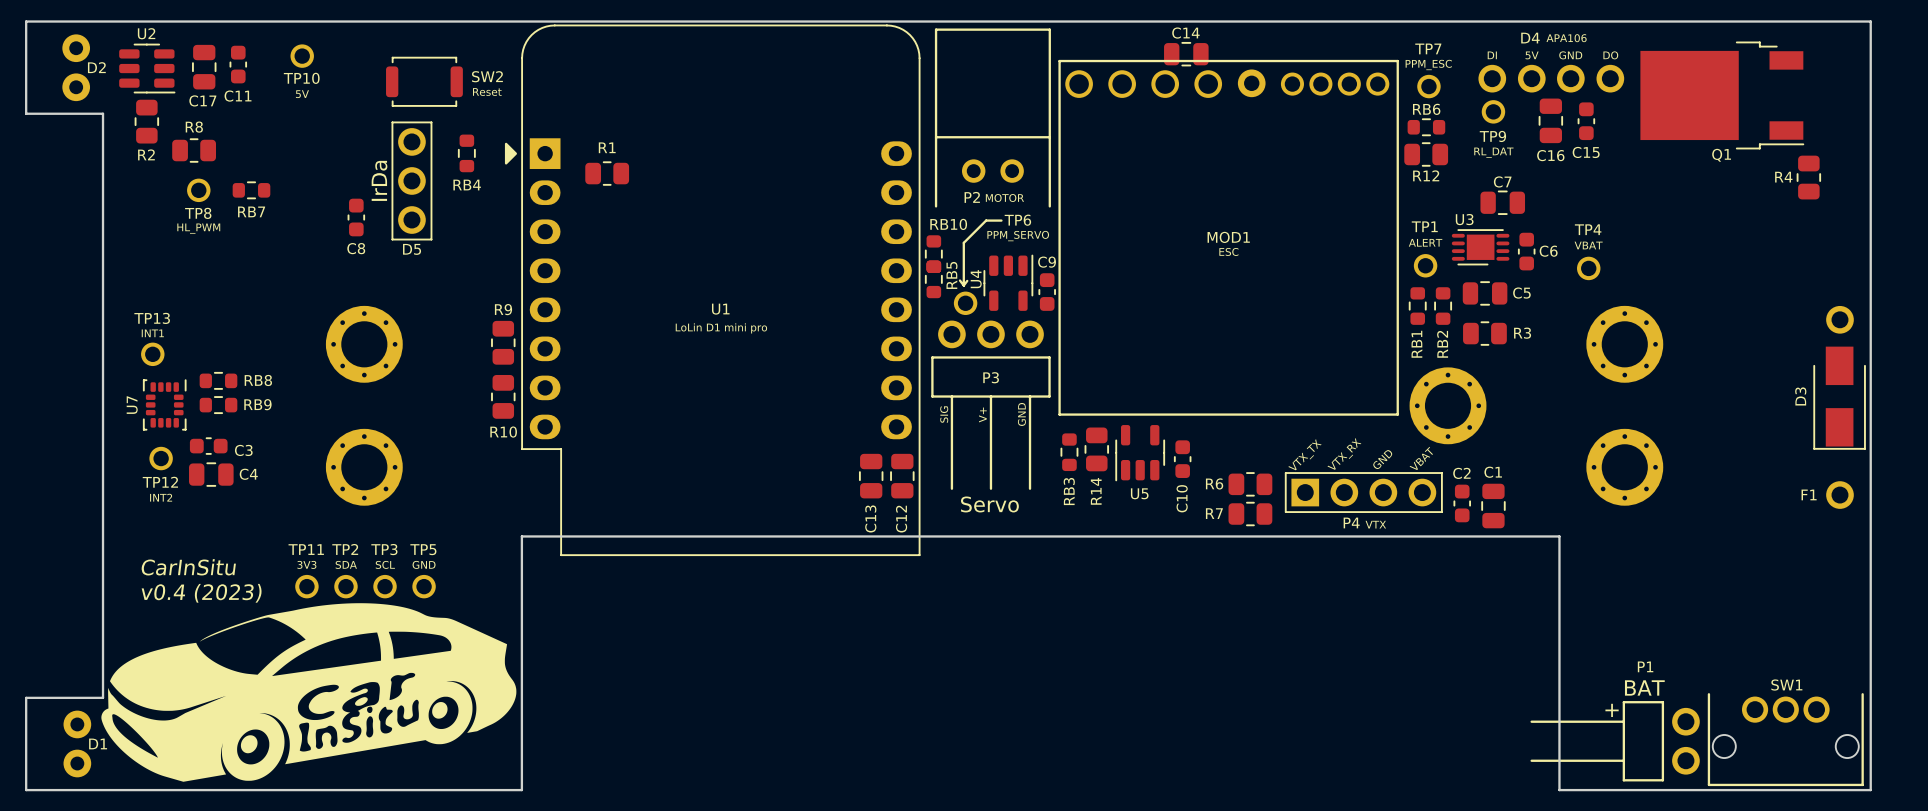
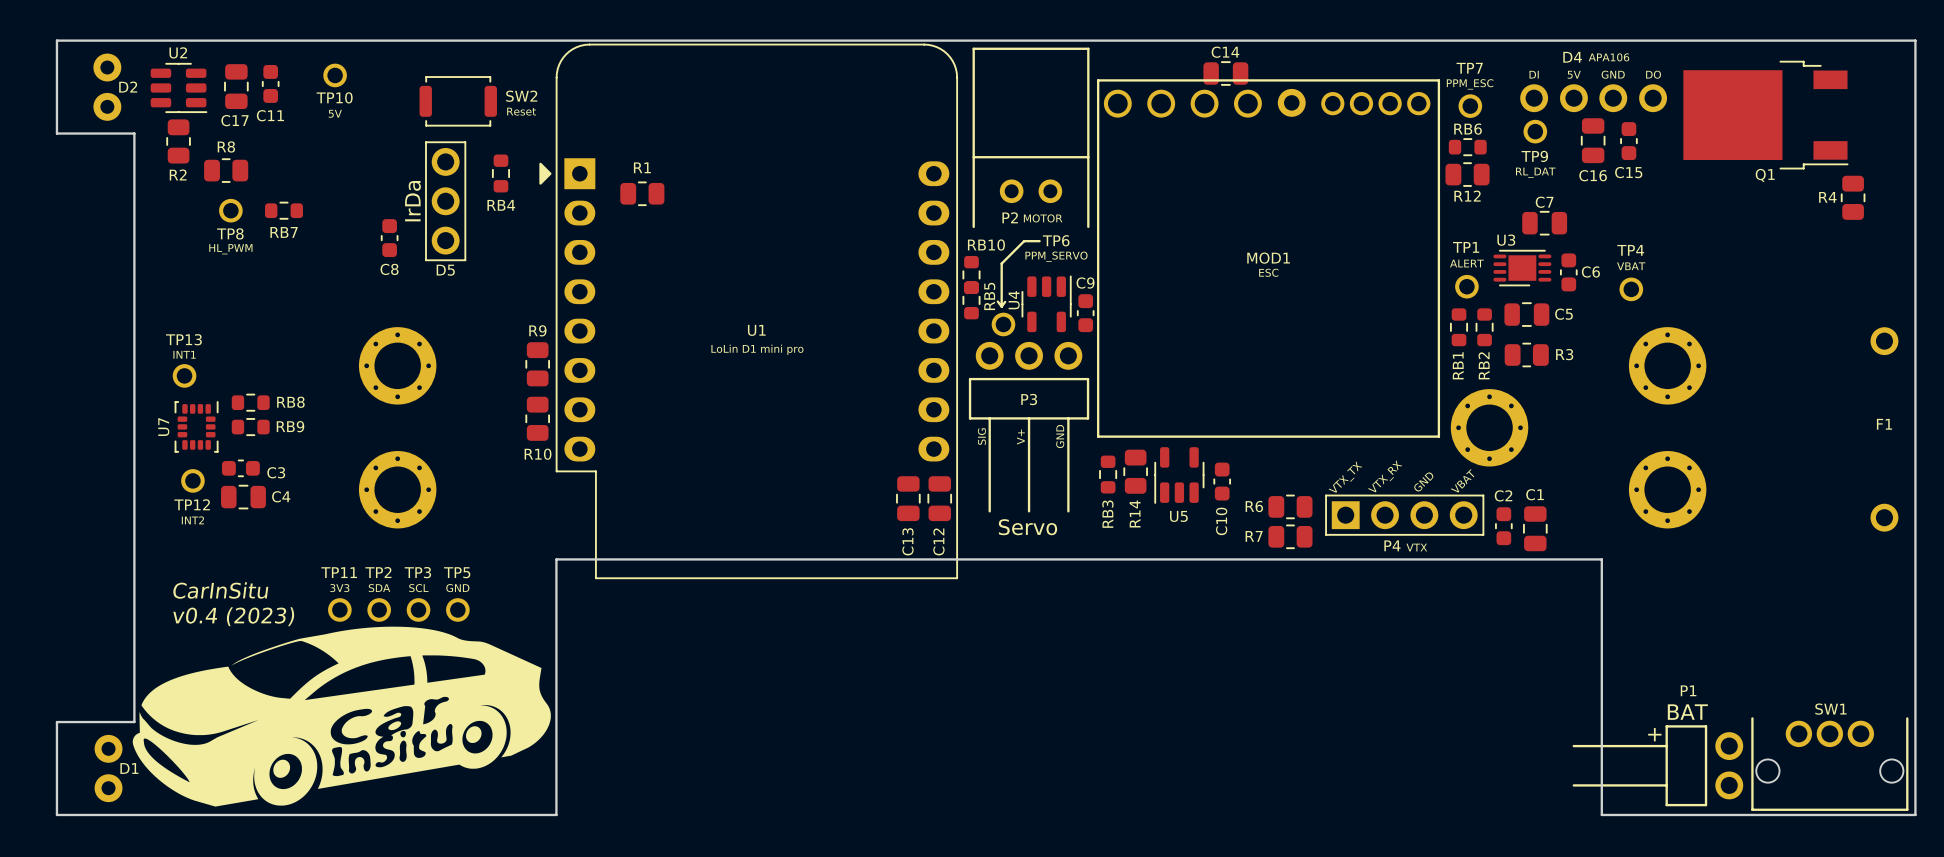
D3: (1839, 398) -> none
F1 name position: F1 (1809, 494) -> F1 (1884, 424)

